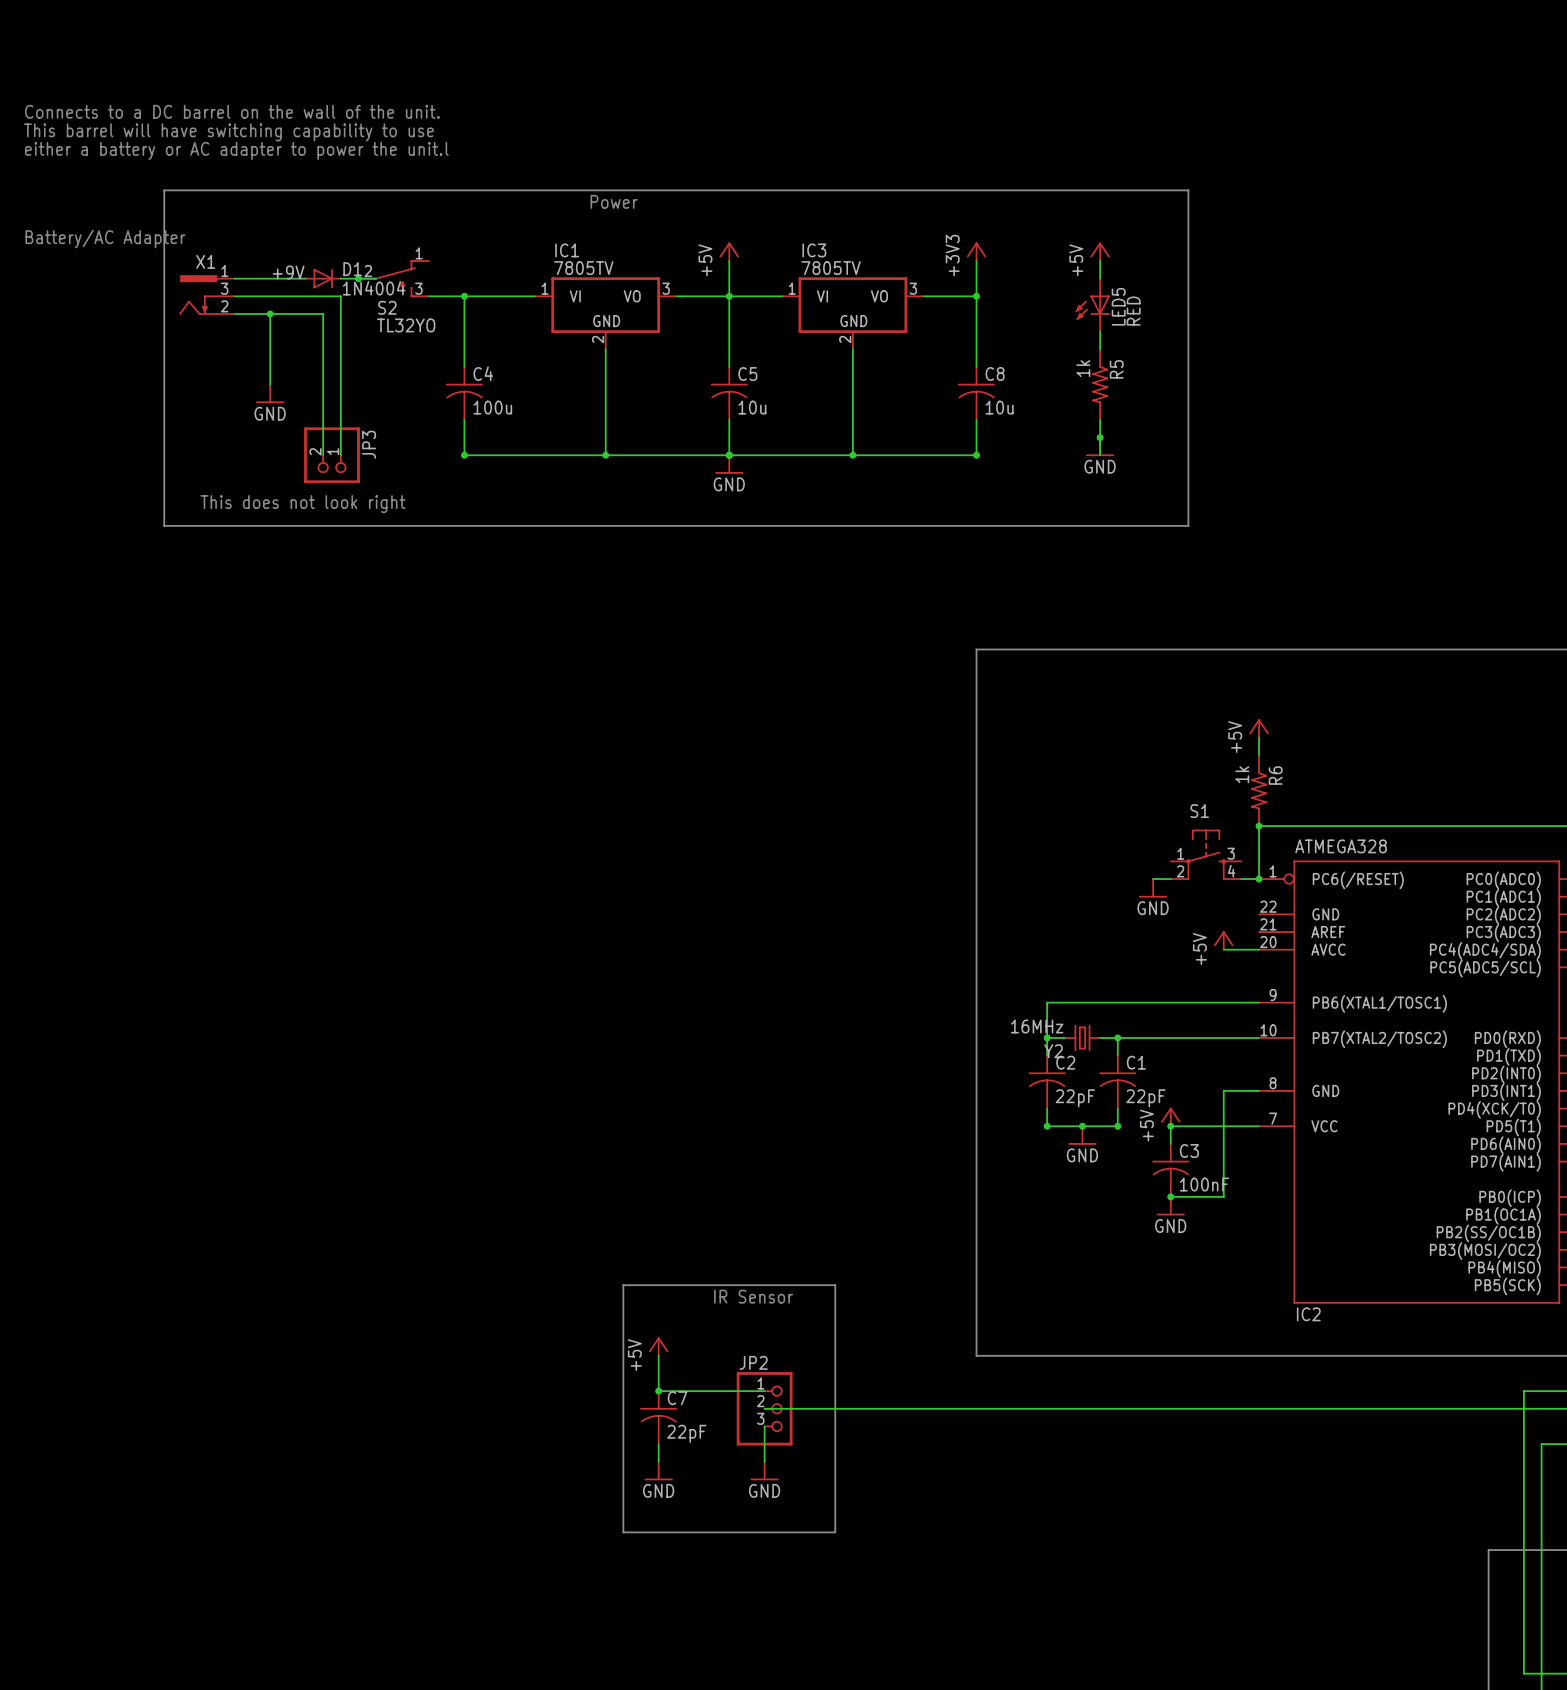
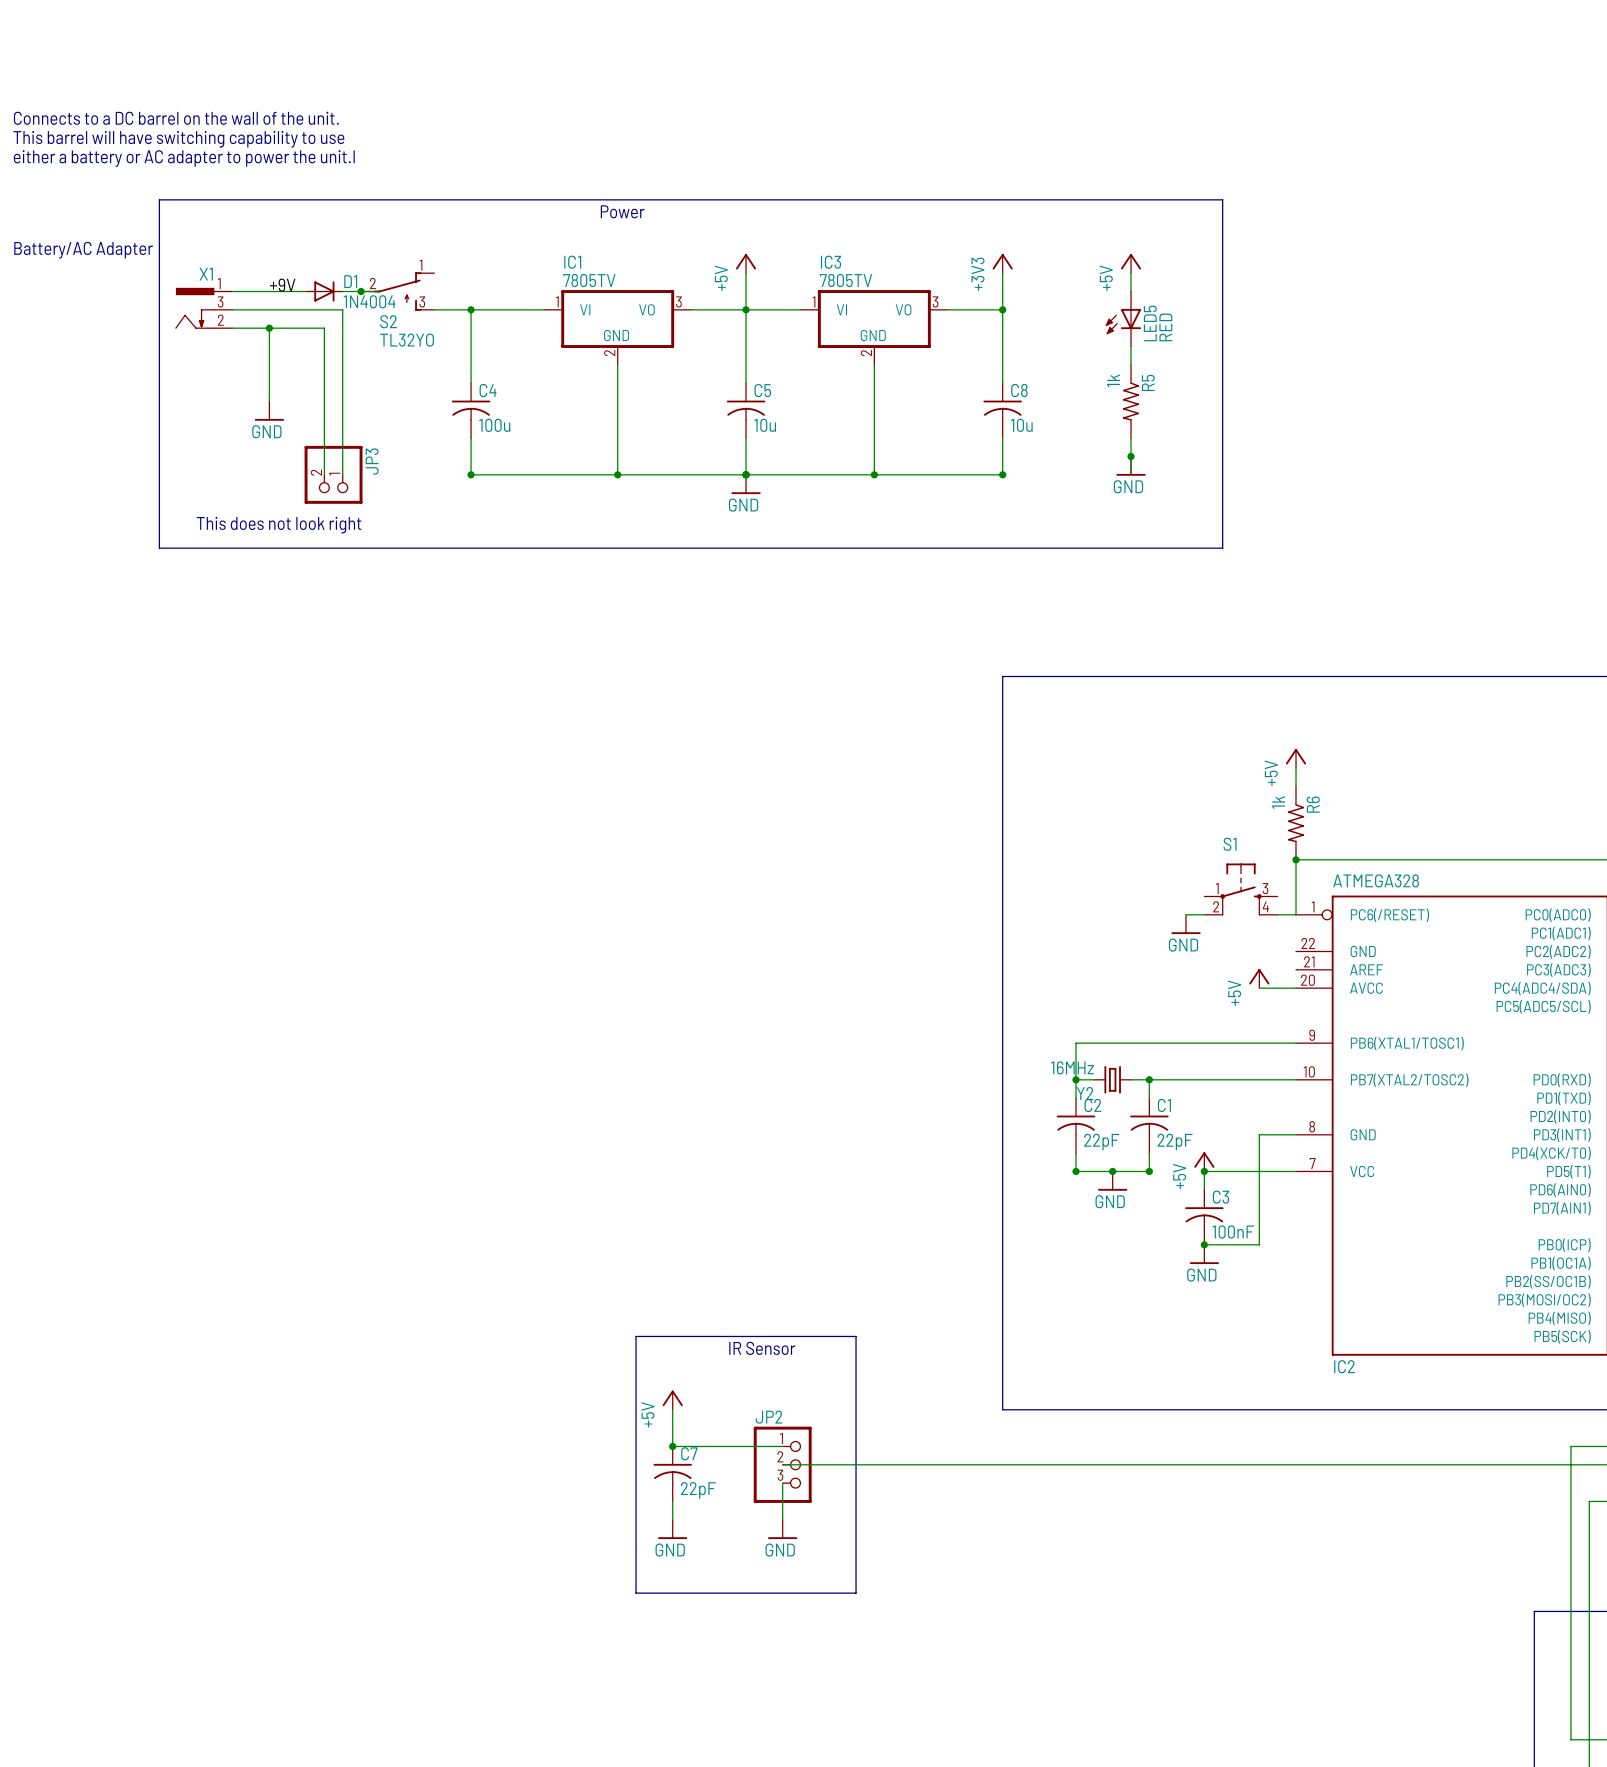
junction: (1259, 879) -> none

